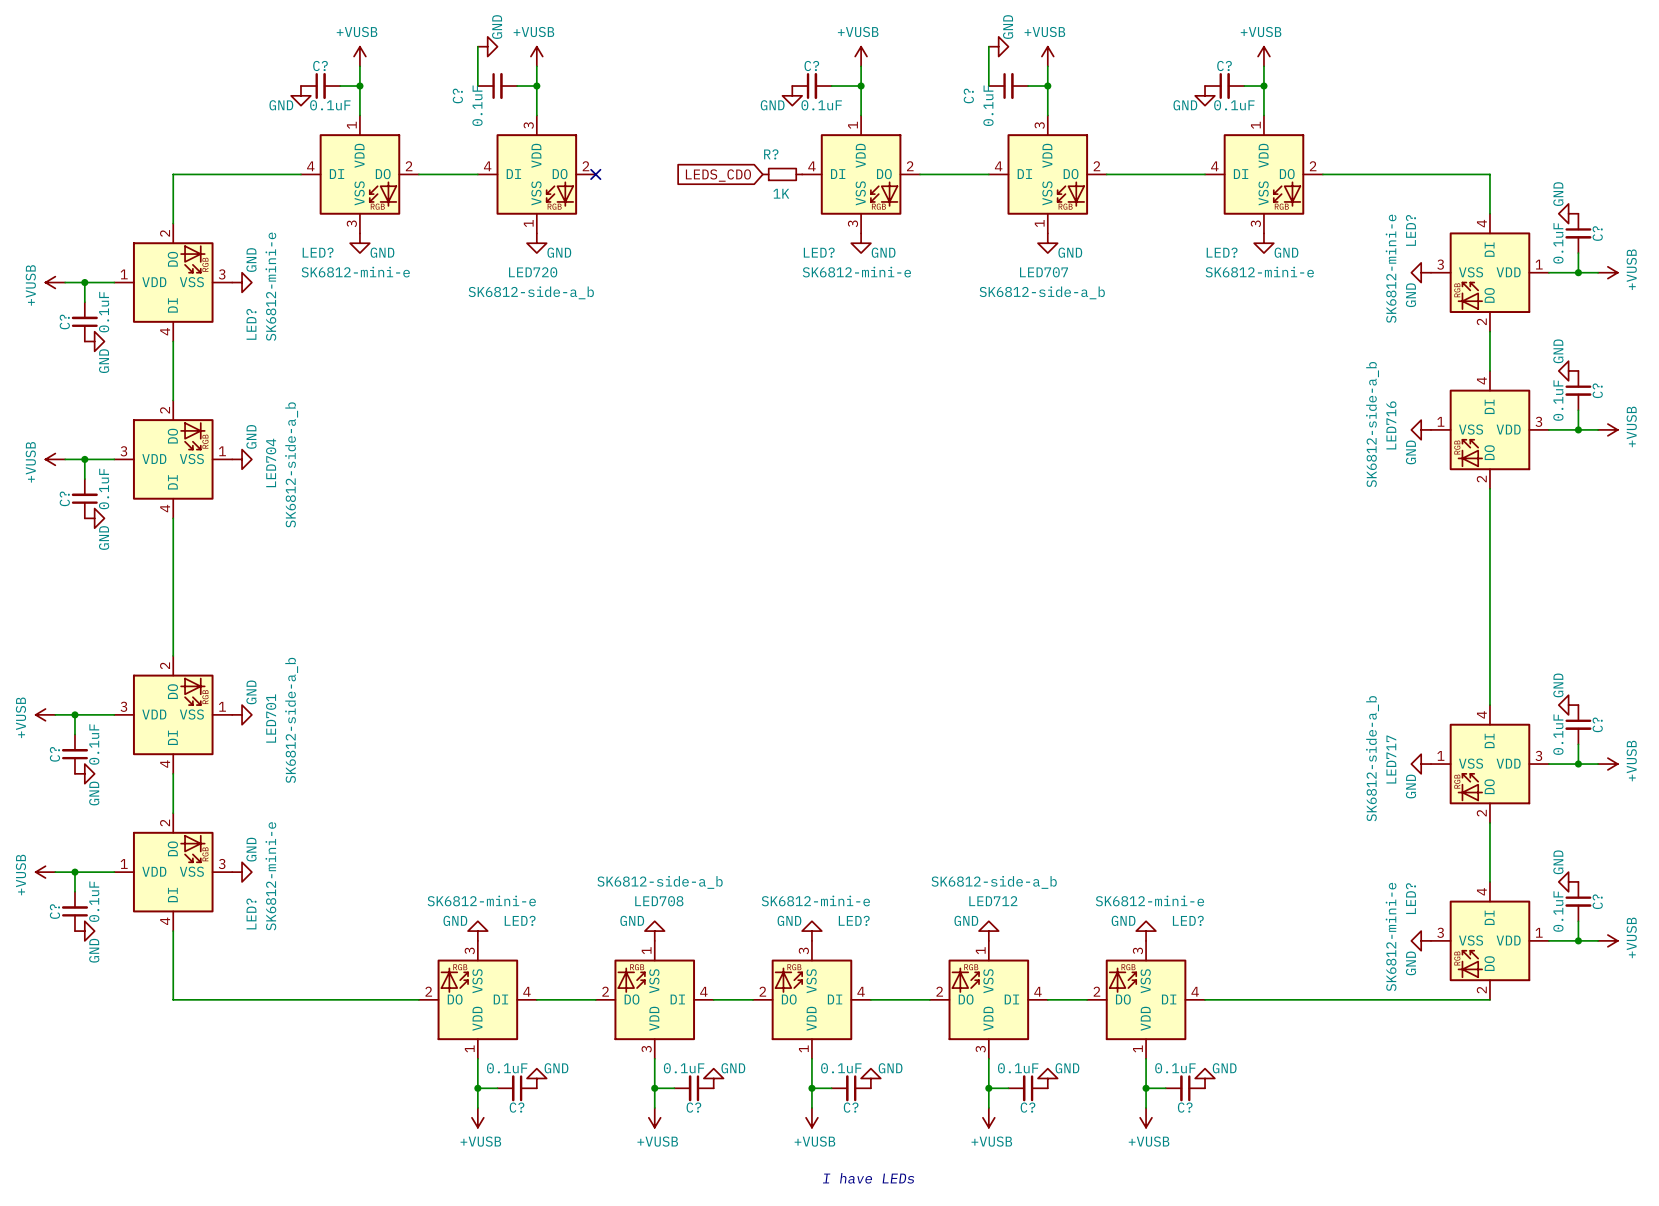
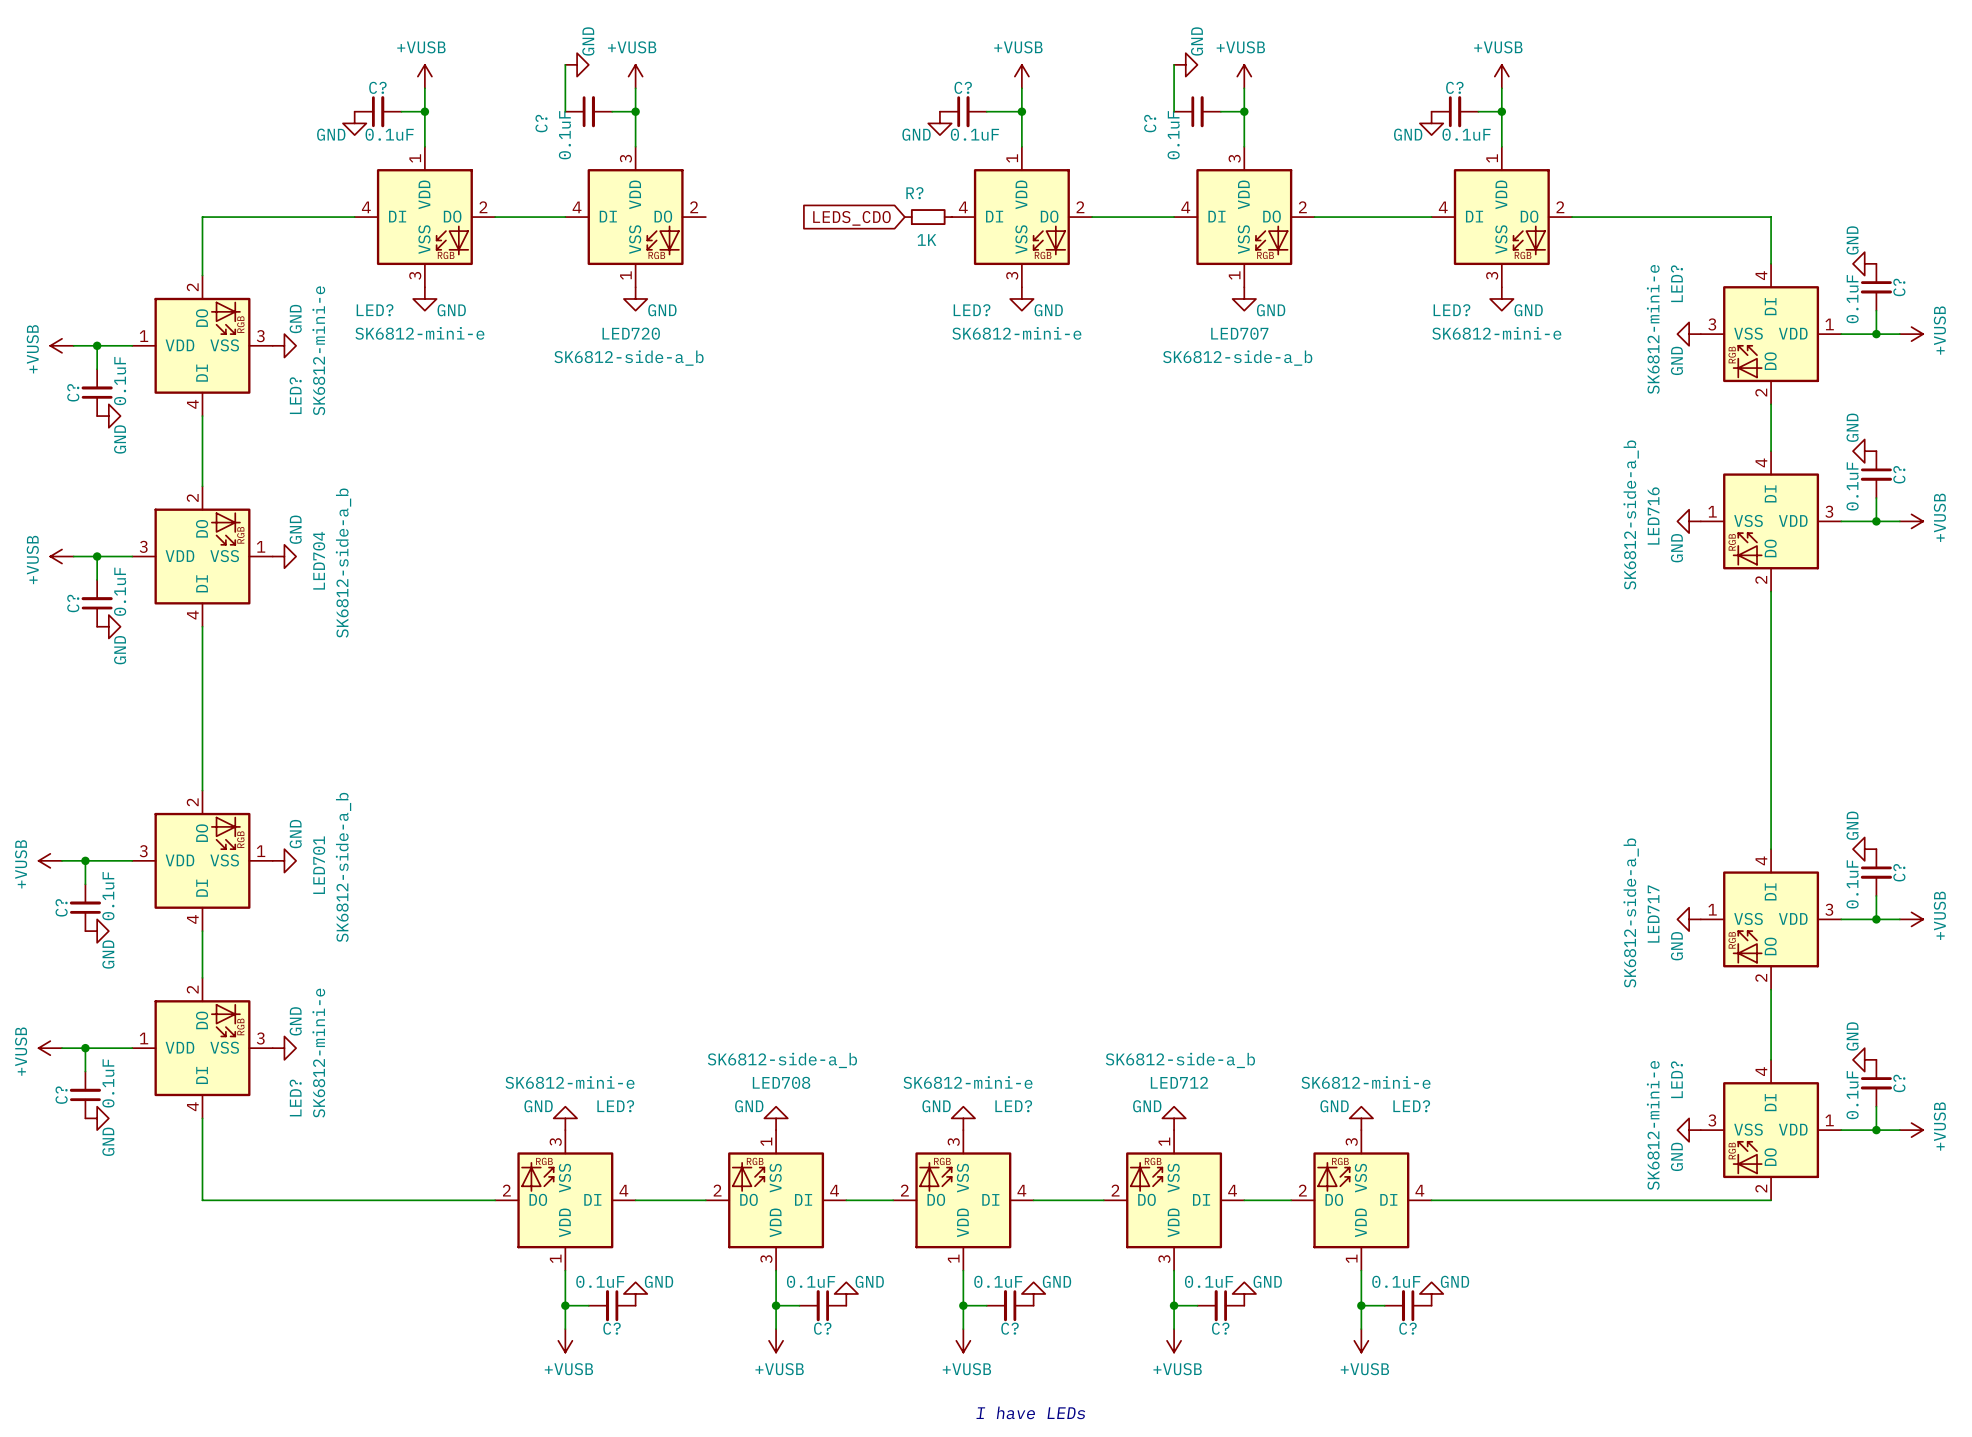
no-connect mark: (595, 174) -> none

